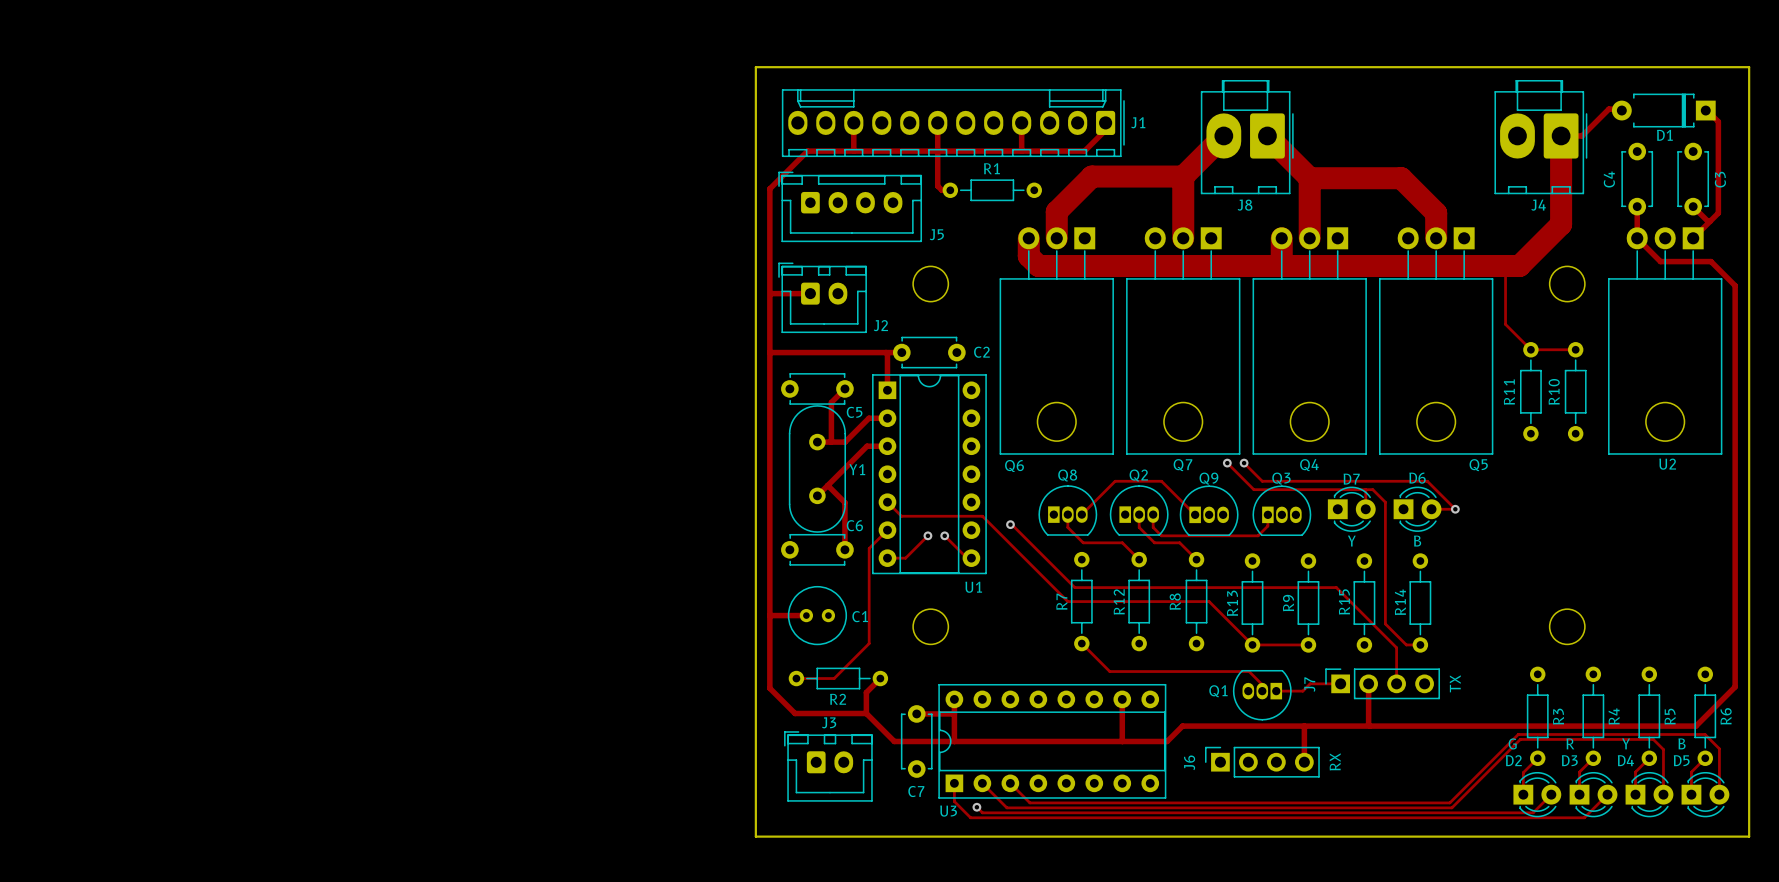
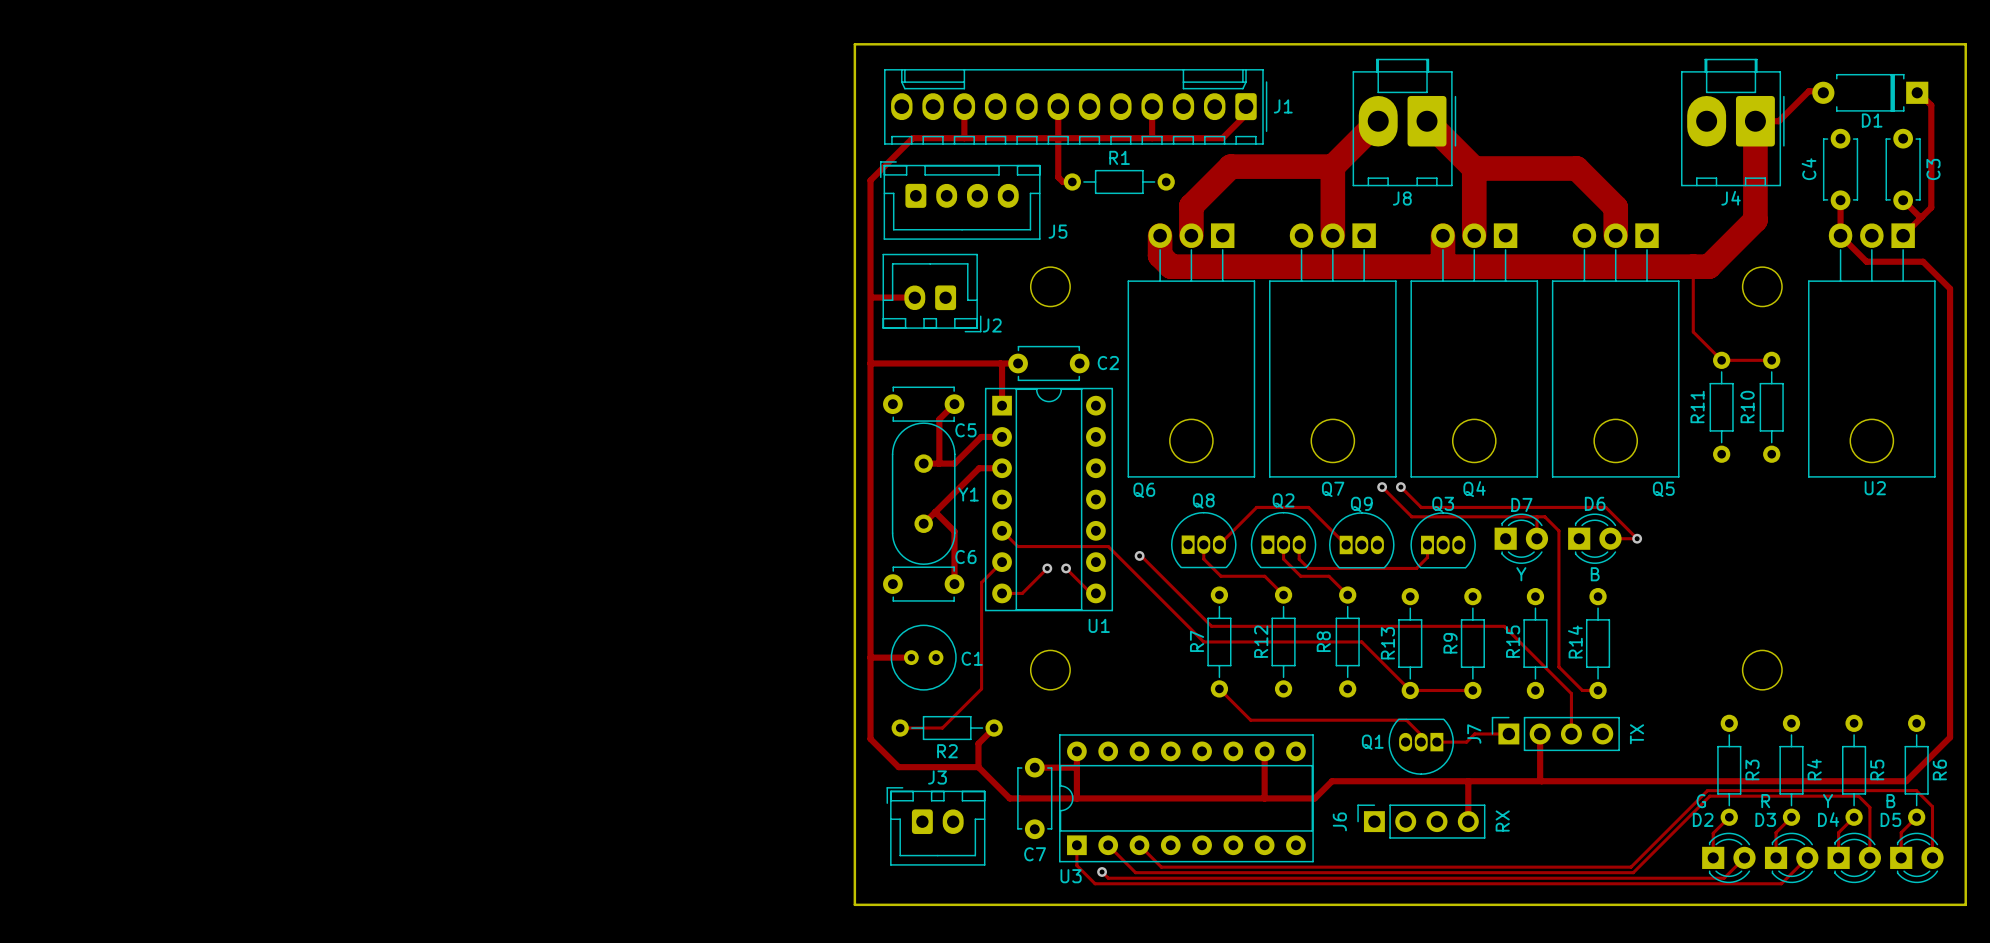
J2 rotation: 0° (822, 297) -> 180° (931, 293)

